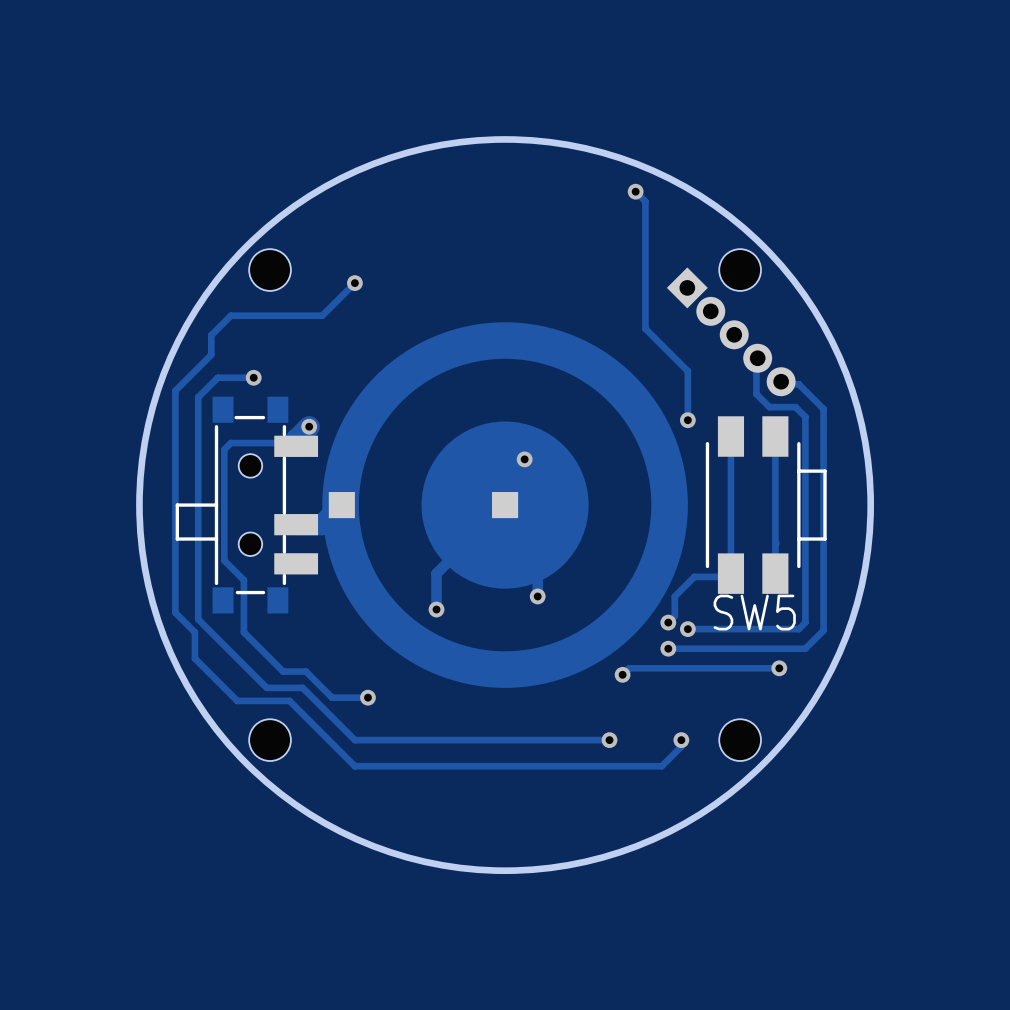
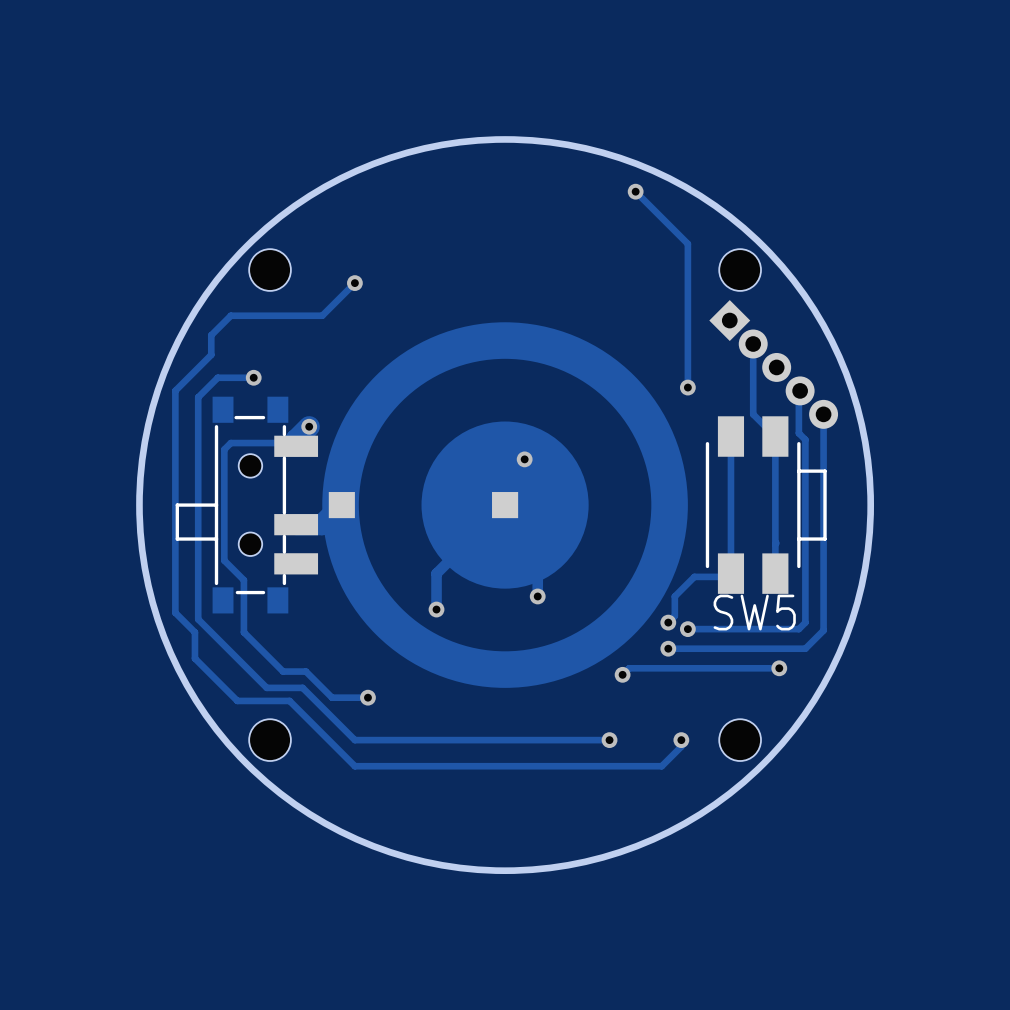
track: (645, 201) (645, 328) (687, 371) -> (645, 201) (687, 243) (687, 371)
part position: (731, 331) -> (773, 364)
track: none -> (753, 343) (753, 414) (775, 436)
track: (757, 358) (756, 394) (769, 407) (795, 407) (805, 416) (805, 439) -> (800, 390) (798, 433) (805, 439)
track: (781, 381) (783, 384) (798, 384) (823, 409) (823, 414) -> none
track: (687, 387) (687, 420) -> none
via position: (687, 420) -> (687, 387)

